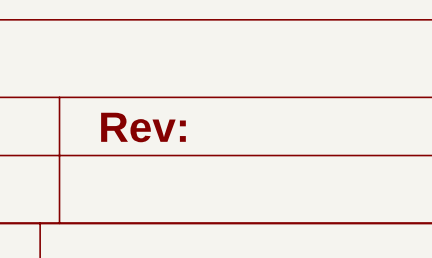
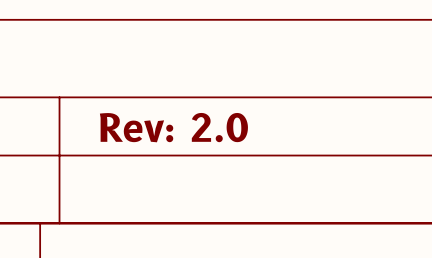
title block: Rev: (143, 127) -> Rev: 2.0 (173, 127)

